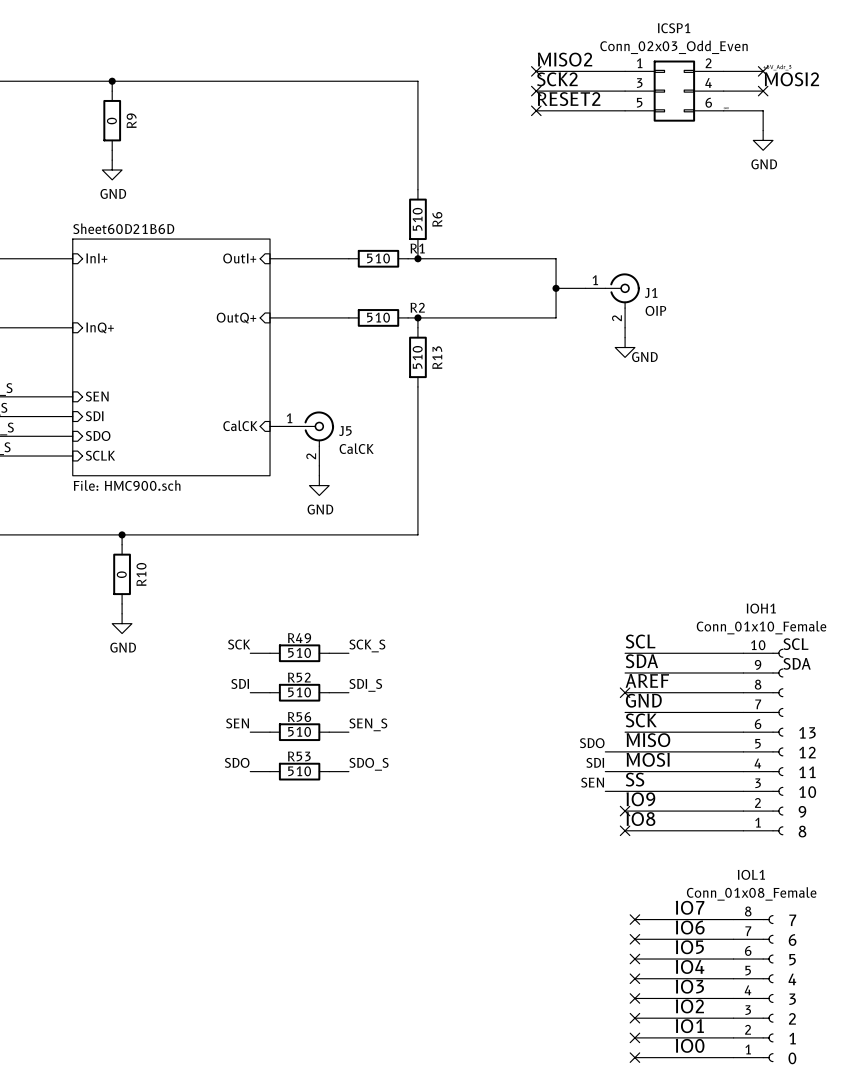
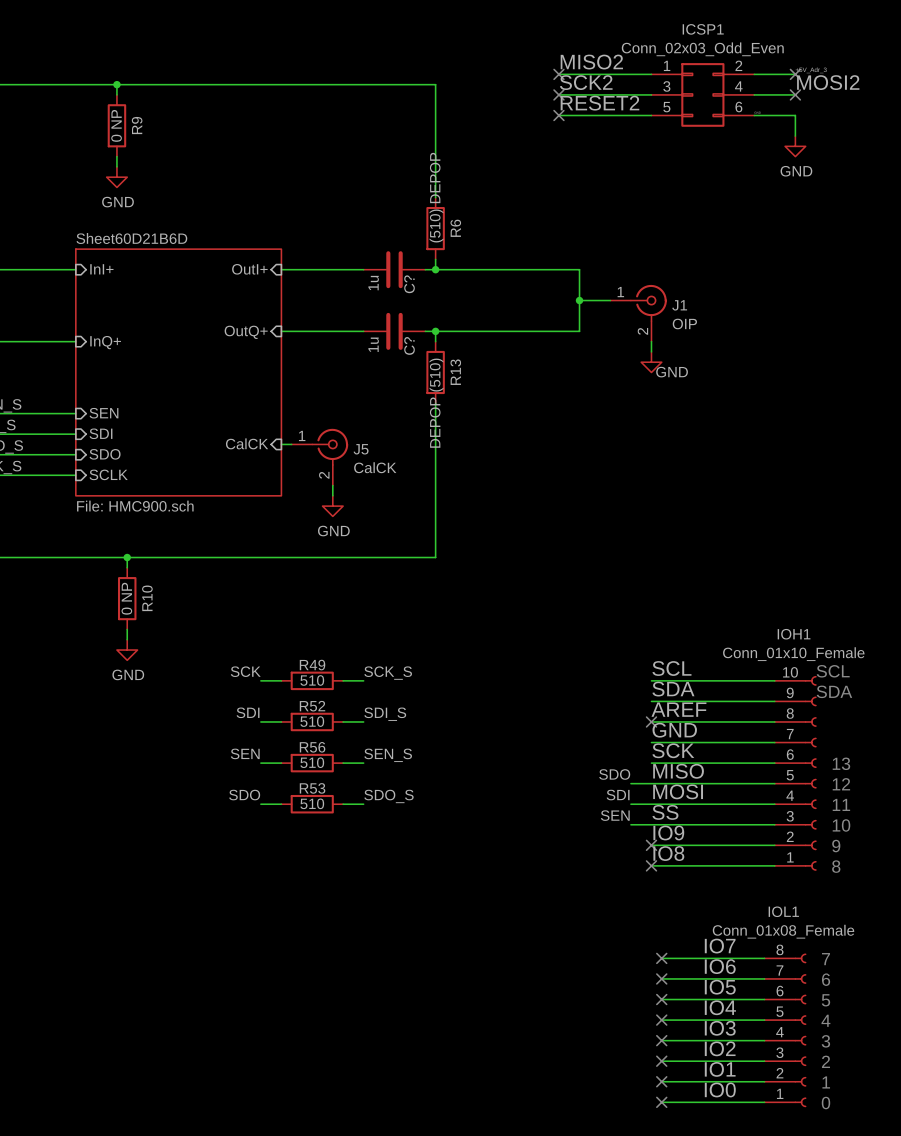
R9 value: 0 (111, 121) -> 0 NP (116, 125)
R6 value: 510 (417, 219) -> (510) DEPOP (436, 197)
R1: 510 (378, 258) -> none
C?: none -> 1u (394, 269)
R2: 510 (378, 317) -> none
C?: none -> 1u (394, 331)
R13 value: 510 (417, 357) -> DEPOP (510) (436, 403)
R10 value: 0 (121, 574) -> 0 NP (126, 598)

